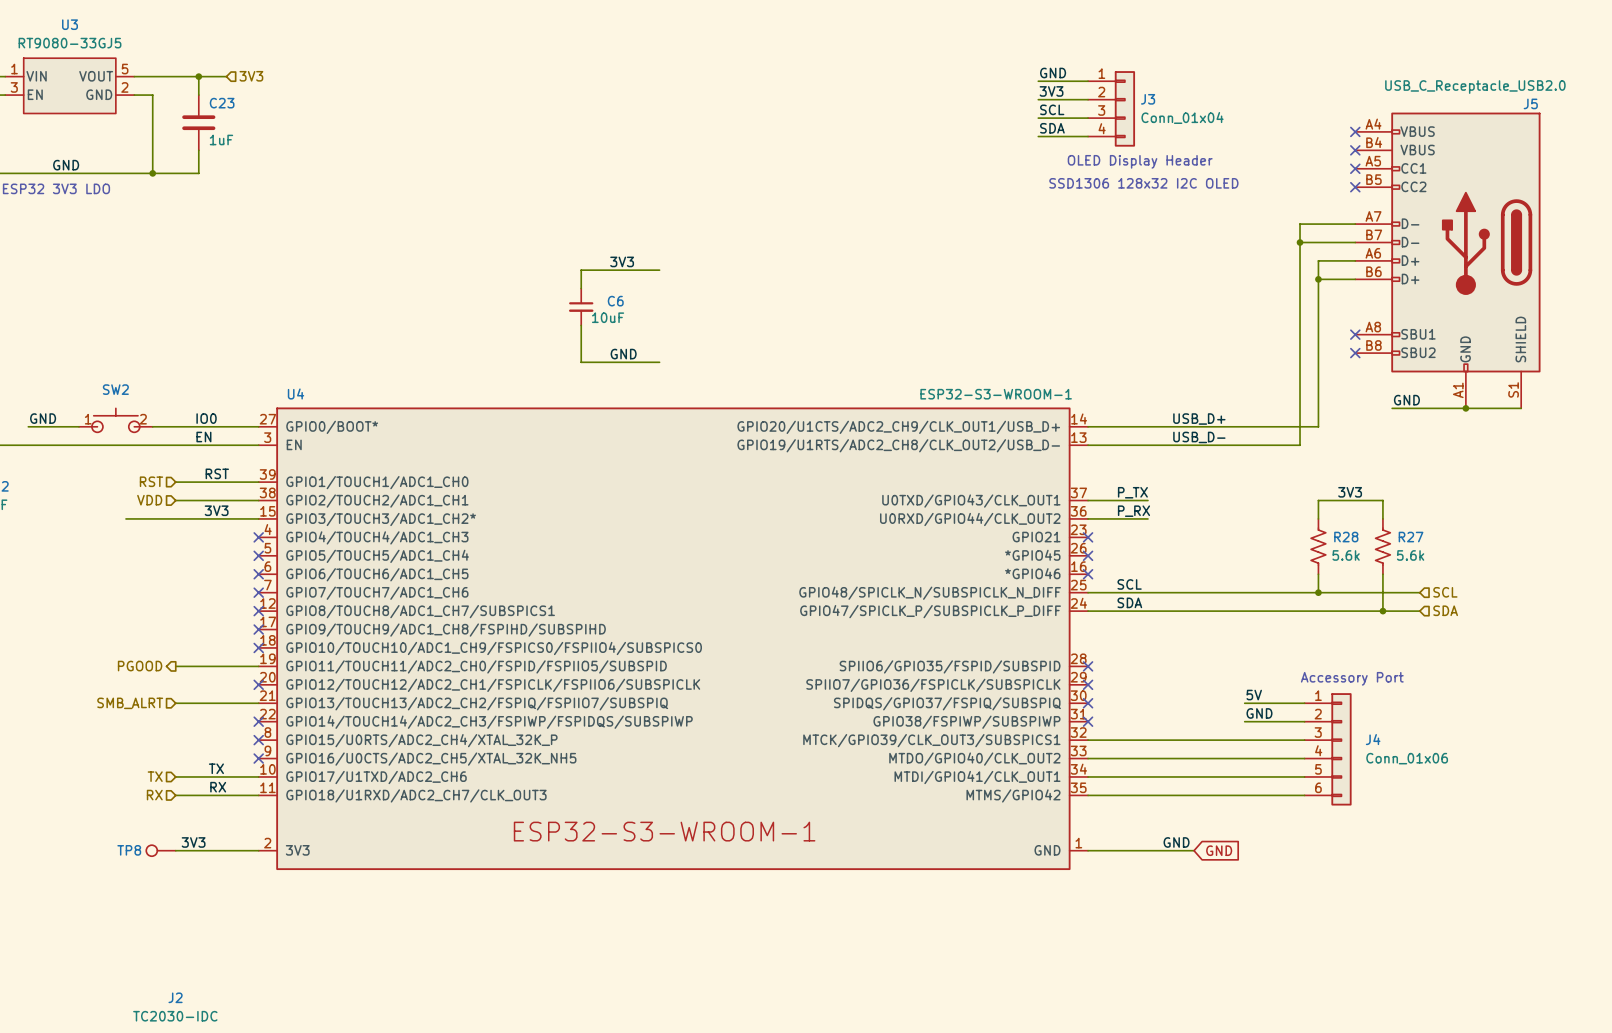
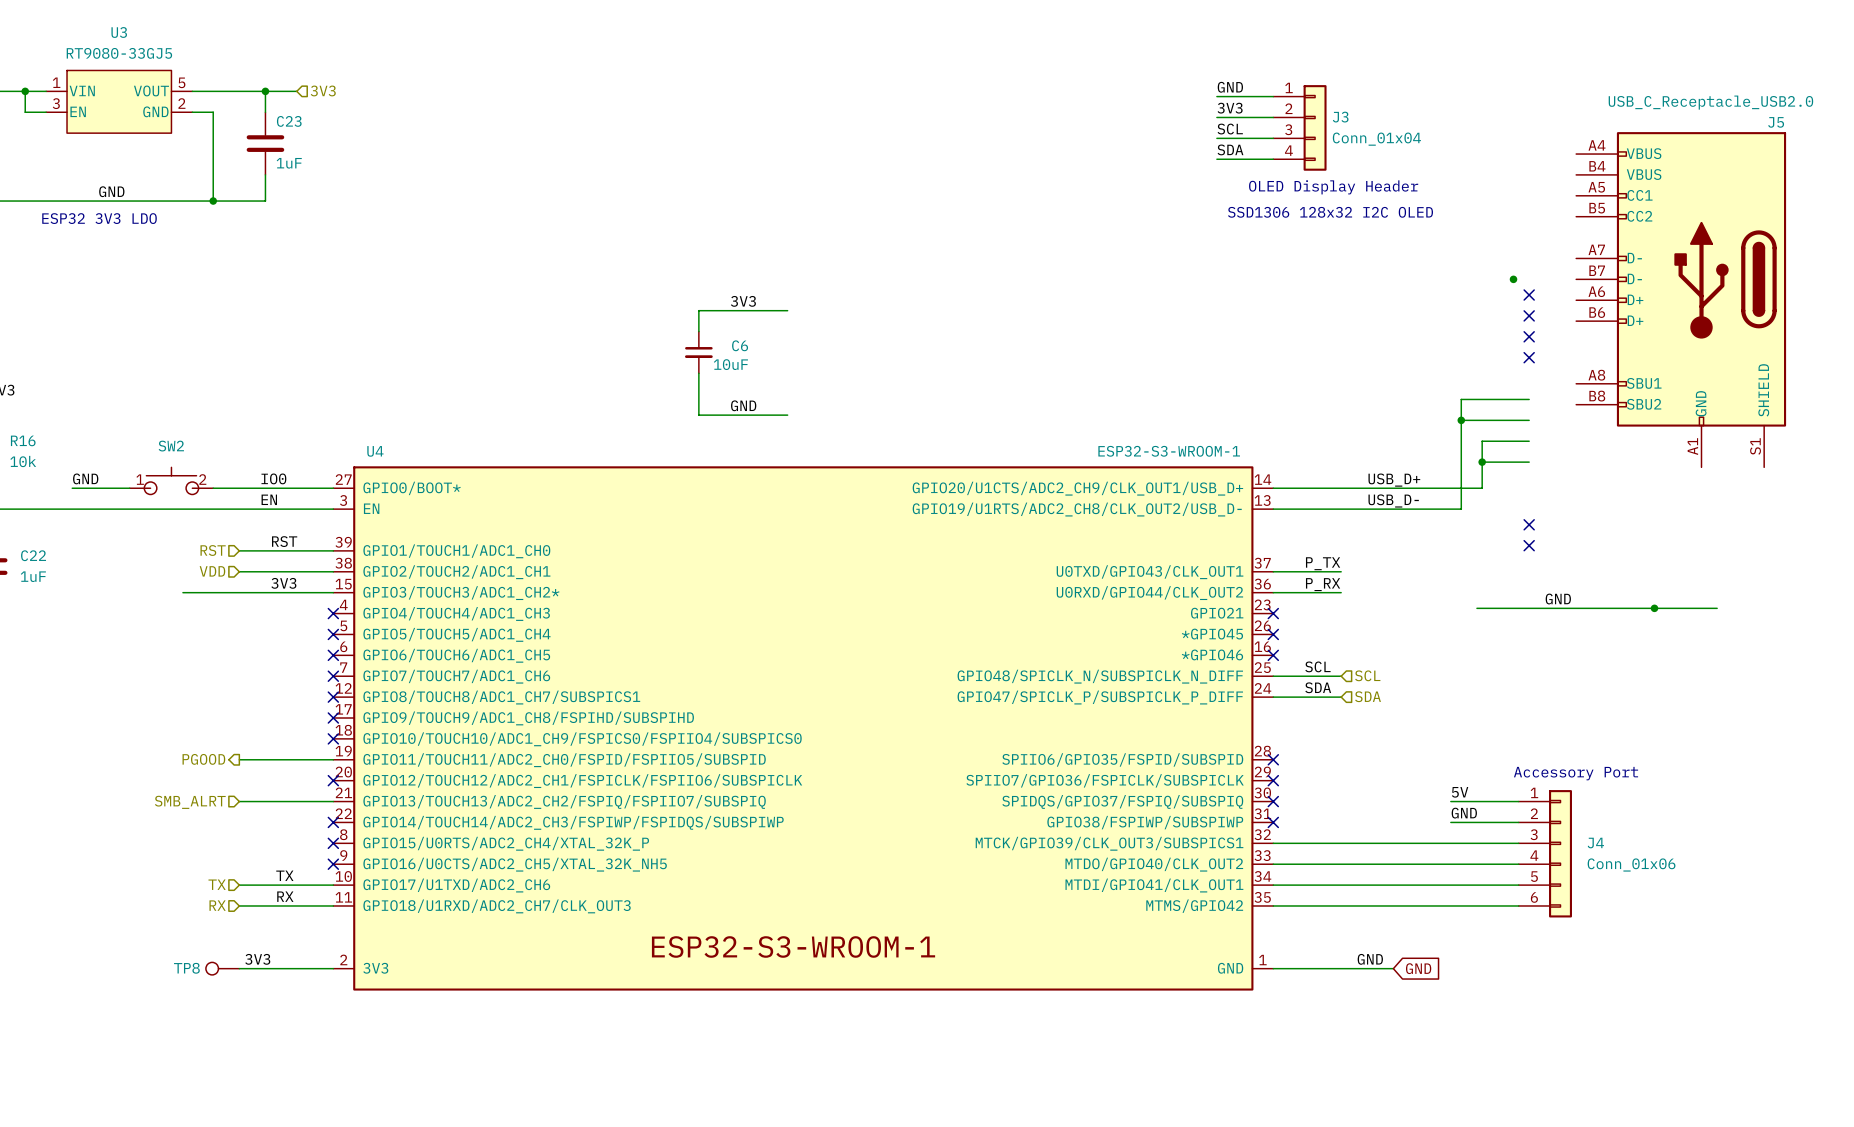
no-connect mark: (1355, 131) -> none
no-connect mark: (1355, 150) -> none
no-connect mark: (1355, 168) -> none
no-connect mark: (1355, 187) -> none
wire: (1355, 224) (1300, 224) (1300, 445) (1253, 445) -> (1529, 399) (1461, 399) (1461, 509)
wire: (1300, 242) (1355, 242) -> none
no-connect mark: none -> (1529, 295)
wire: (1355, 260) (1318, 260) (1318, 426) (1272, 426) -> (1529, 441) (1482, 441) (1482, 488)
no-connect mark: none -> (1529, 315)
wire: (1318, 279) (1355, 279) -> none
junction: (1318, 279) -> none
no-connect mark: none -> (1529, 336)
no-connect mark: none -> (1529, 357)
no-connect mark: (1355, 334) -> none
no-connect mark: (1355, 353) -> none
wire: none -> (1461, 420) (1529, 420)
junction: none -> (1461, 420)
label position: GND (1406, 400) -> GND (1558, 599)
wire: none -> (1482, 462) (1529, 462)
junction: none -> (1482, 462)
wire: (1392, 408) (1521, 408) -> none
junction: (1465, 408) -> none
no-connect mark: none -> (1529, 524)
no-connect mark: none -> (1529, 545)
label: 3V3 (1350, 492) -> none
wire: (1318, 518) (1318, 500) (1382, 500) (1382, 518) -> none
wire: none -> (1476, 608) (1717, 608)
junction: none -> (1654, 608)
R28: 5.6k (1318, 546) -> none
R27: 5.6k (1382, 546) -> none
wire: (1318, 574) (1318, 592) -> none
wire: (1382, 574) (1382, 611) -> none
wire: (1147, 592) (1419, 592) -> none
hierarchical label: none -> SCL (1367, 675)
junction: (1318, 592) -> none
hierarchical label: SCL (1445, 592) -> none
hierarchical label: none -> SDA (1368, 696)
hierarchical label: SDA (1445, 610) -> none
wire: (1147, 611) (1419, 611) -> none
junction: (1382, 611) -> none

